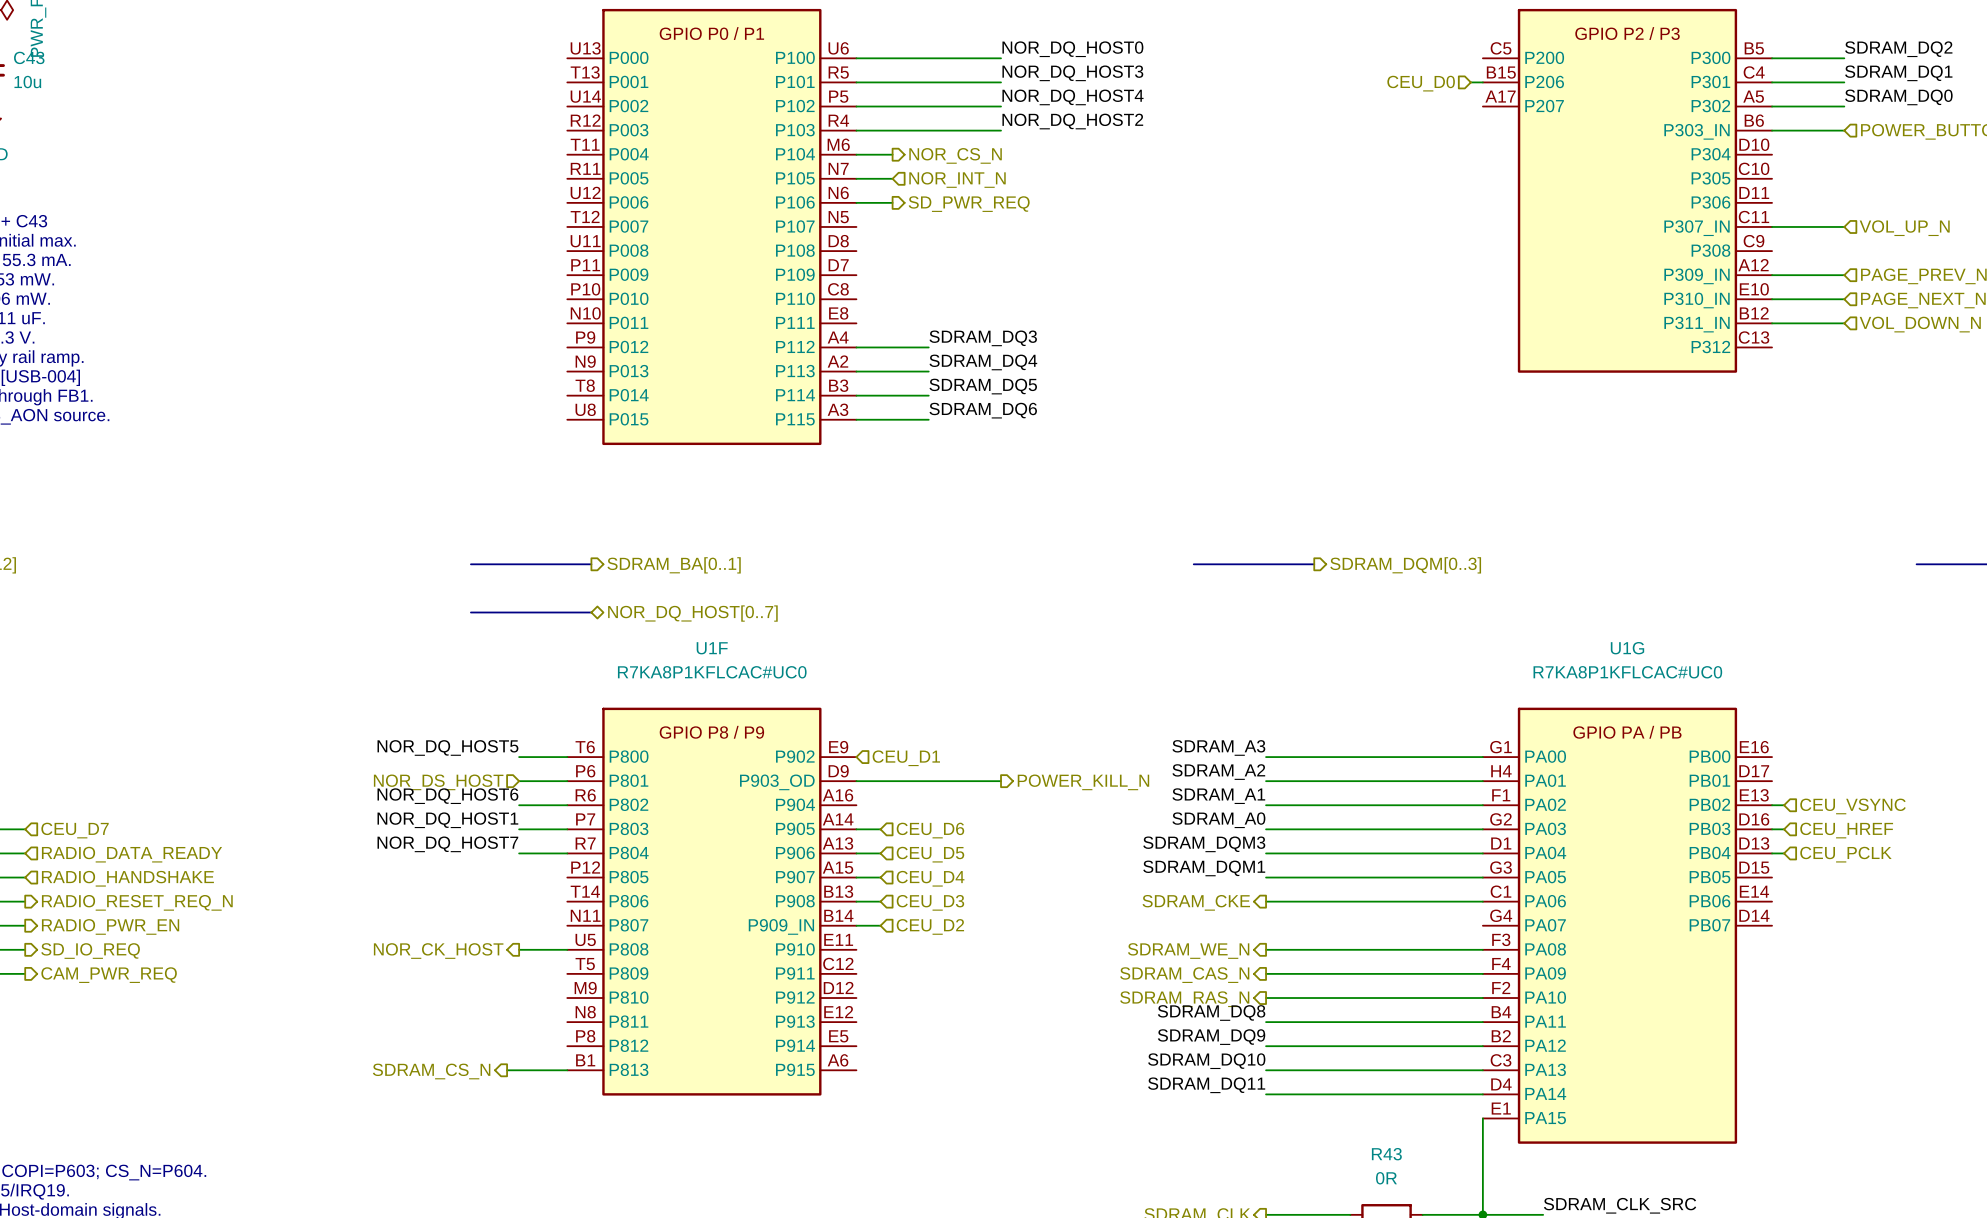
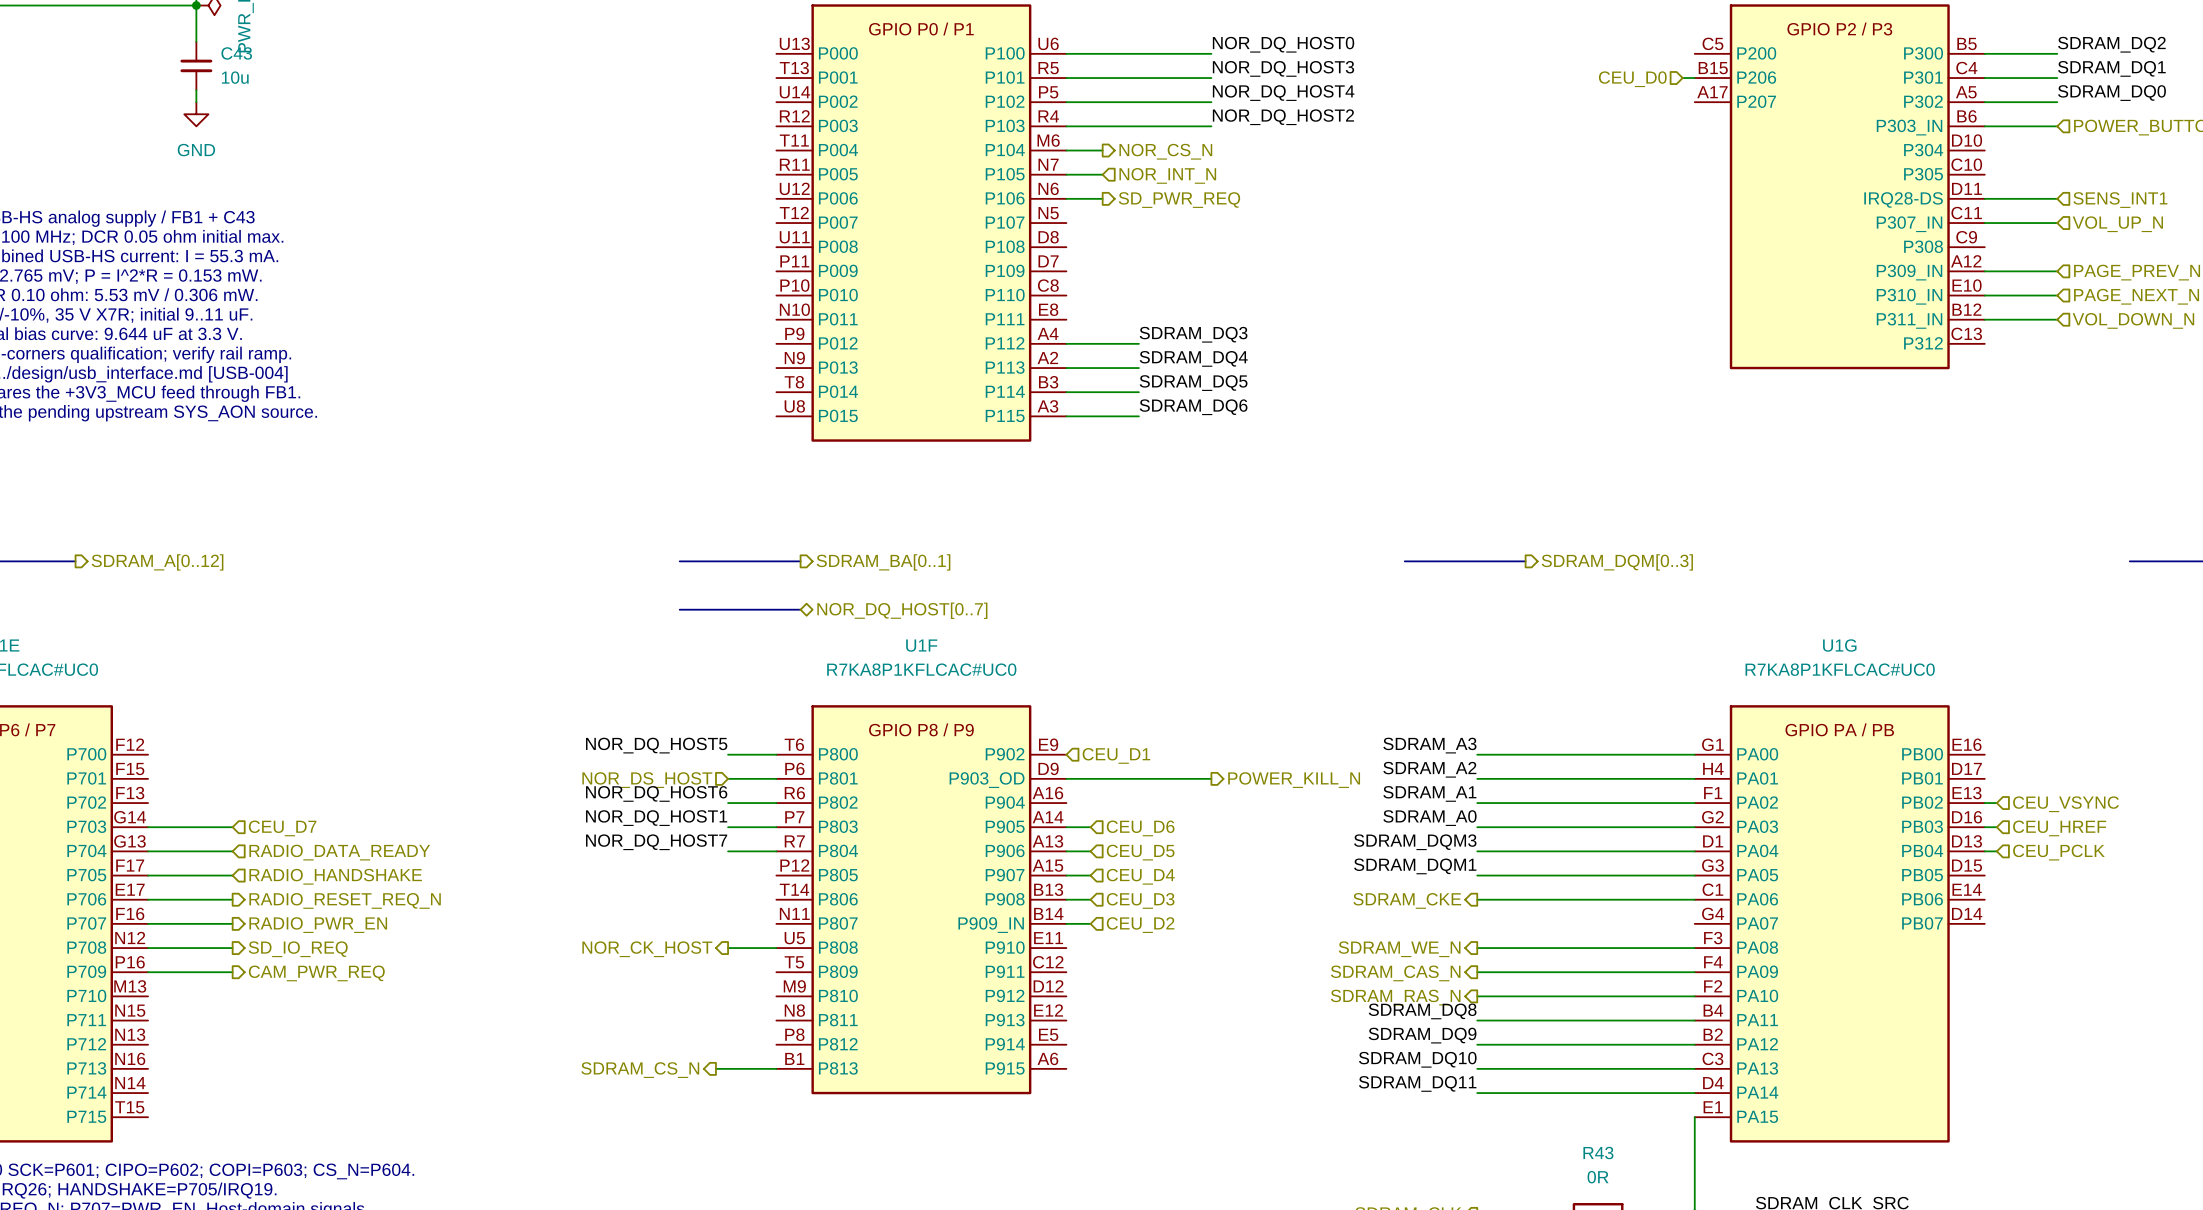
part pin name: P306 (1710, 202) -> IRQ28-DS (1903, 199)
wire: none -> (1984, 198) (2057, 198)
hierarchical label: none -> SENS_INT1 (2120, 200)

